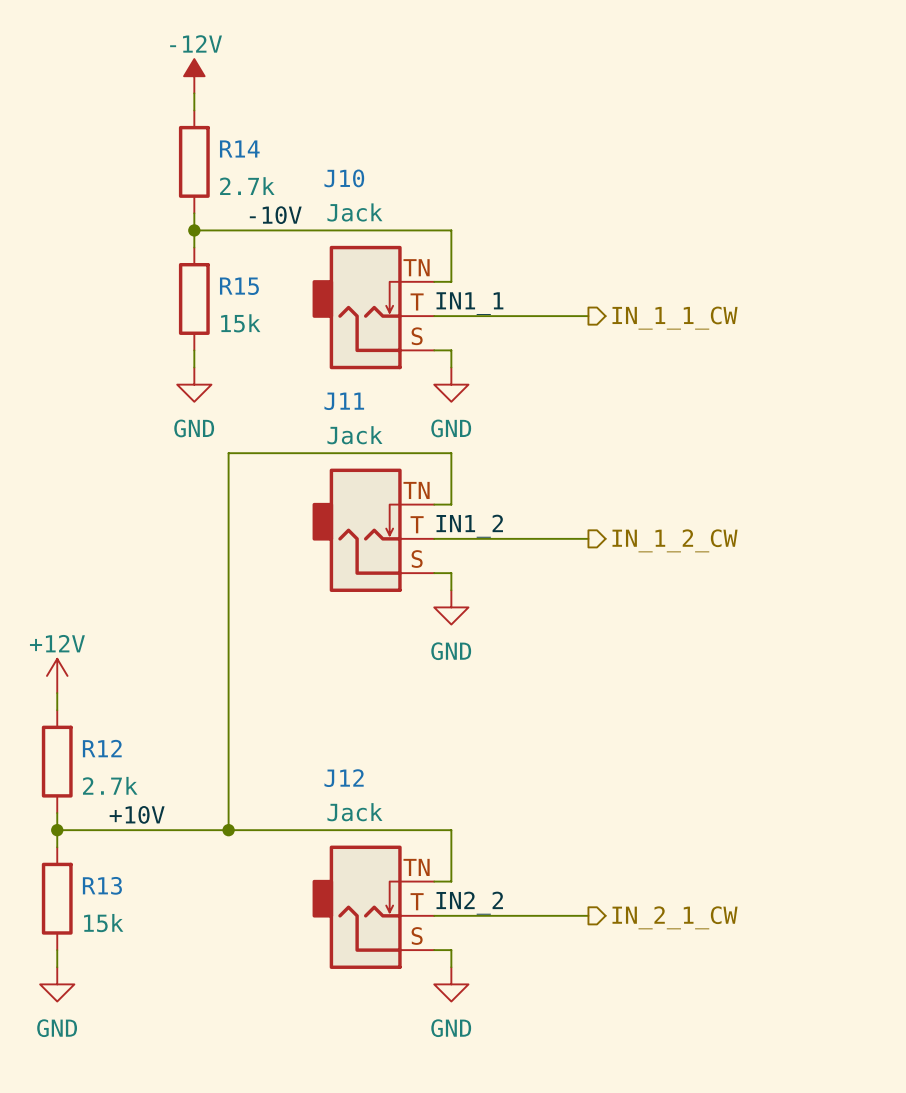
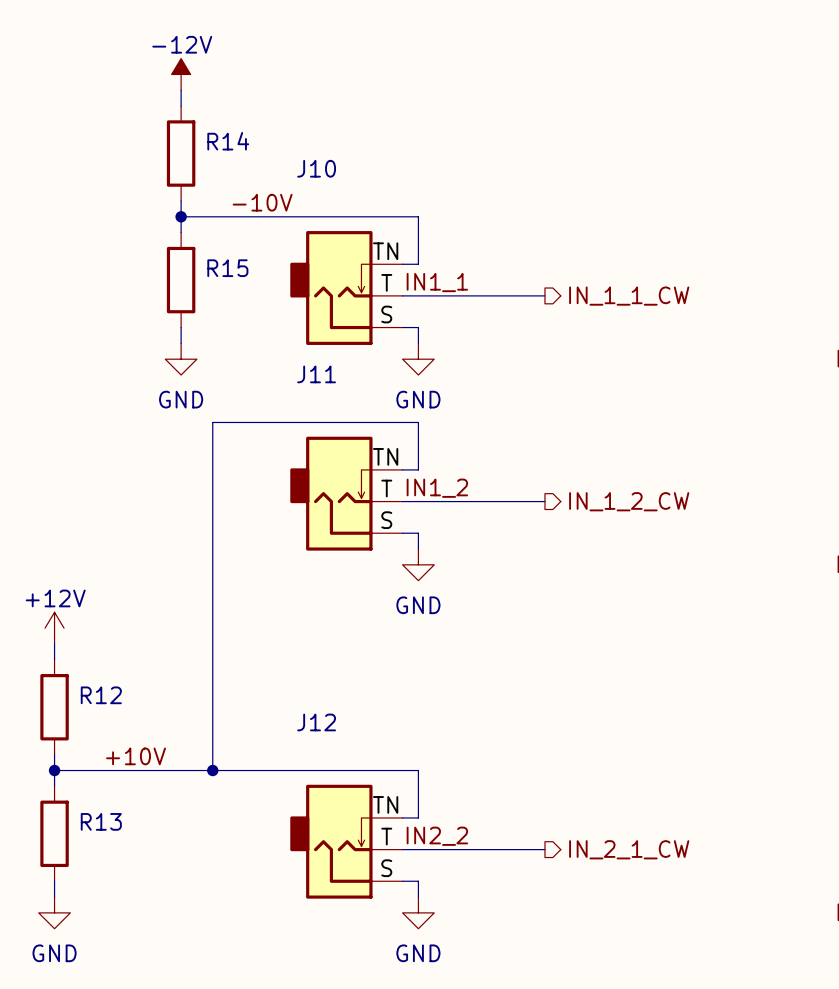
R14 value: 2.7k (247, 186) -> none
J10 value: Jack (354, 212) -> none
R15 value: 15k (240, 323) -> none
J11 value: Jack (354, 435) -> none
R12 value: 2.7k (110, 785) -> none
J12 value: Jack (354, 812) -> none
R13 value: 15k (103, 923) -> none

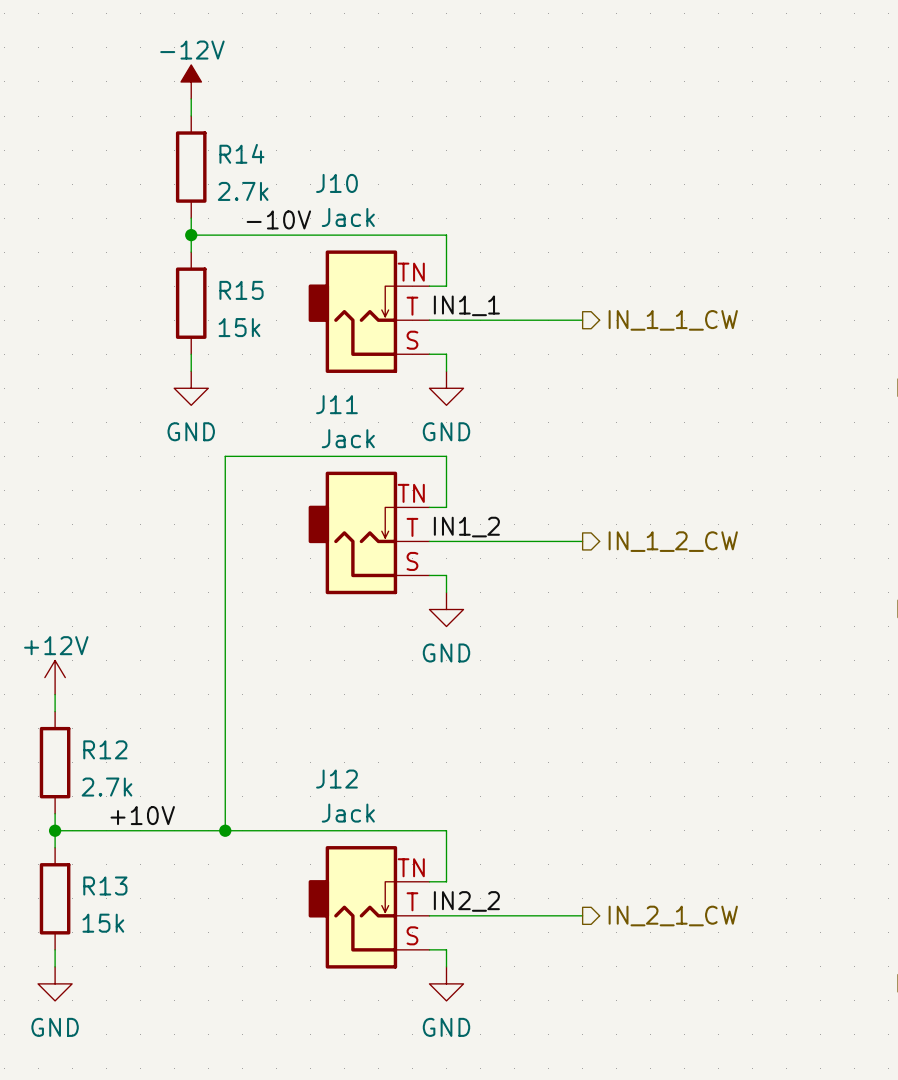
R14 value: none -> 2.7k (243, 191)
J10 value: none -> Jack (348, 217)
R15 value: none -> 15k (239, 327)
J11 value: none -> Jack (348, 438)
R12 value: none -> 2.7k (107, 787)
J12 value: none -> Jack (348, 813)
R13 value: none -> 15k (103, 923)

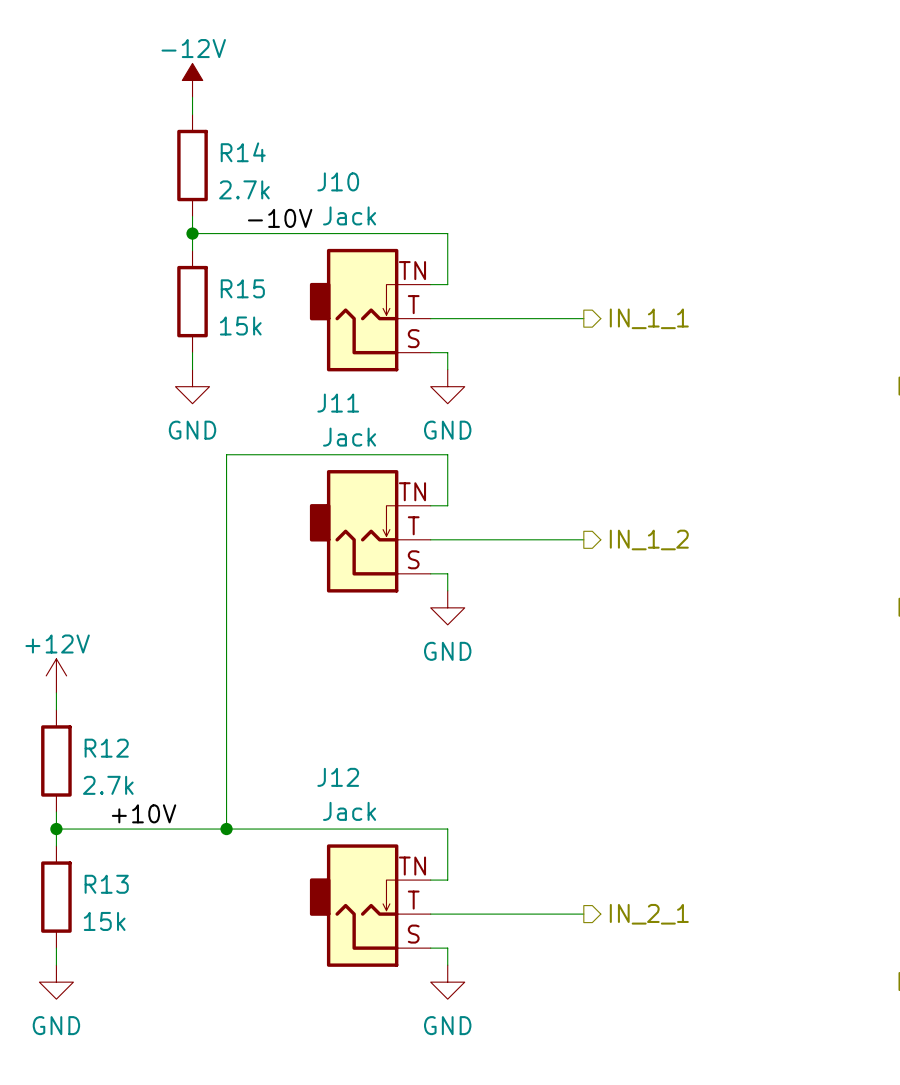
label: IN1_1 (466, 305) -> none
hierarchical label: IN_1_1_CW (673, 320) -> IN_1_1 (649, 318)
label: IN1_2 (466, 527) -> none
hierarchical label: IN_1_2_CW (673, 541) -> IN_1_2 (649, 539)
label: IN2_2 (466, 901) -> none
hierarchical label: IN_2_1_CW (673, 916) -> IN_2_1 (649, 914)

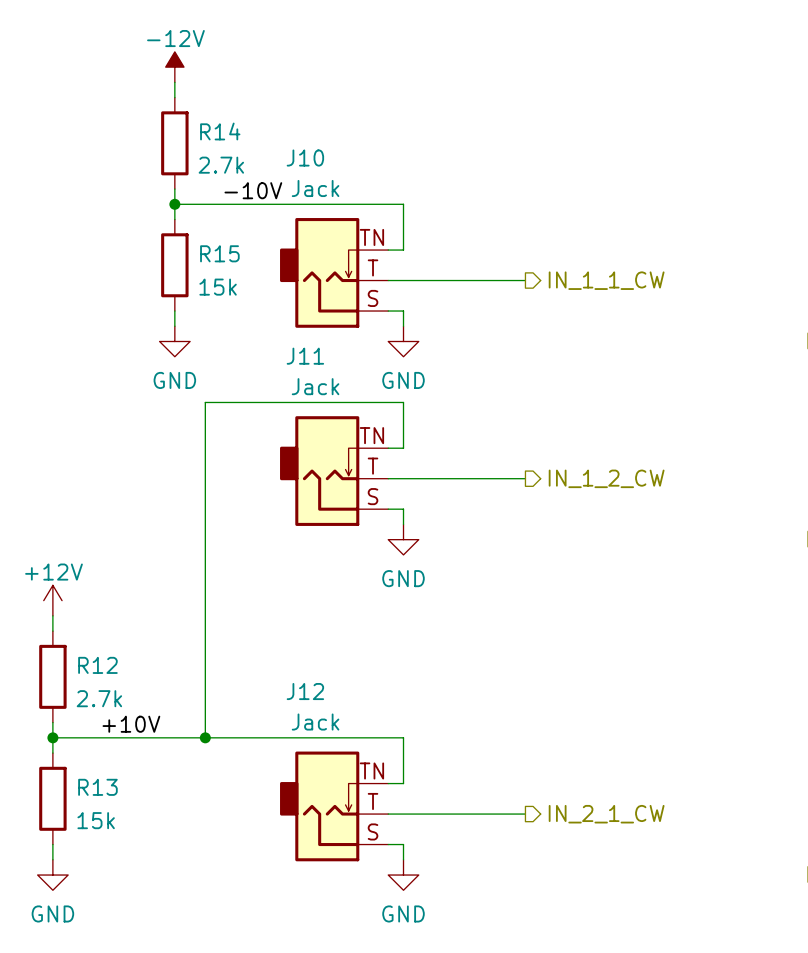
hierarchical label: IN_1_1 (649, 318) -> IN_1_1_CW (606, 280)
hierarchical label: IN_1_2 (649, 539) -> IN_1_2_CW (606, 478)
hierarchical label: IN_2_1 (649, 914) -> IN_2_1_CW (606, 814)

